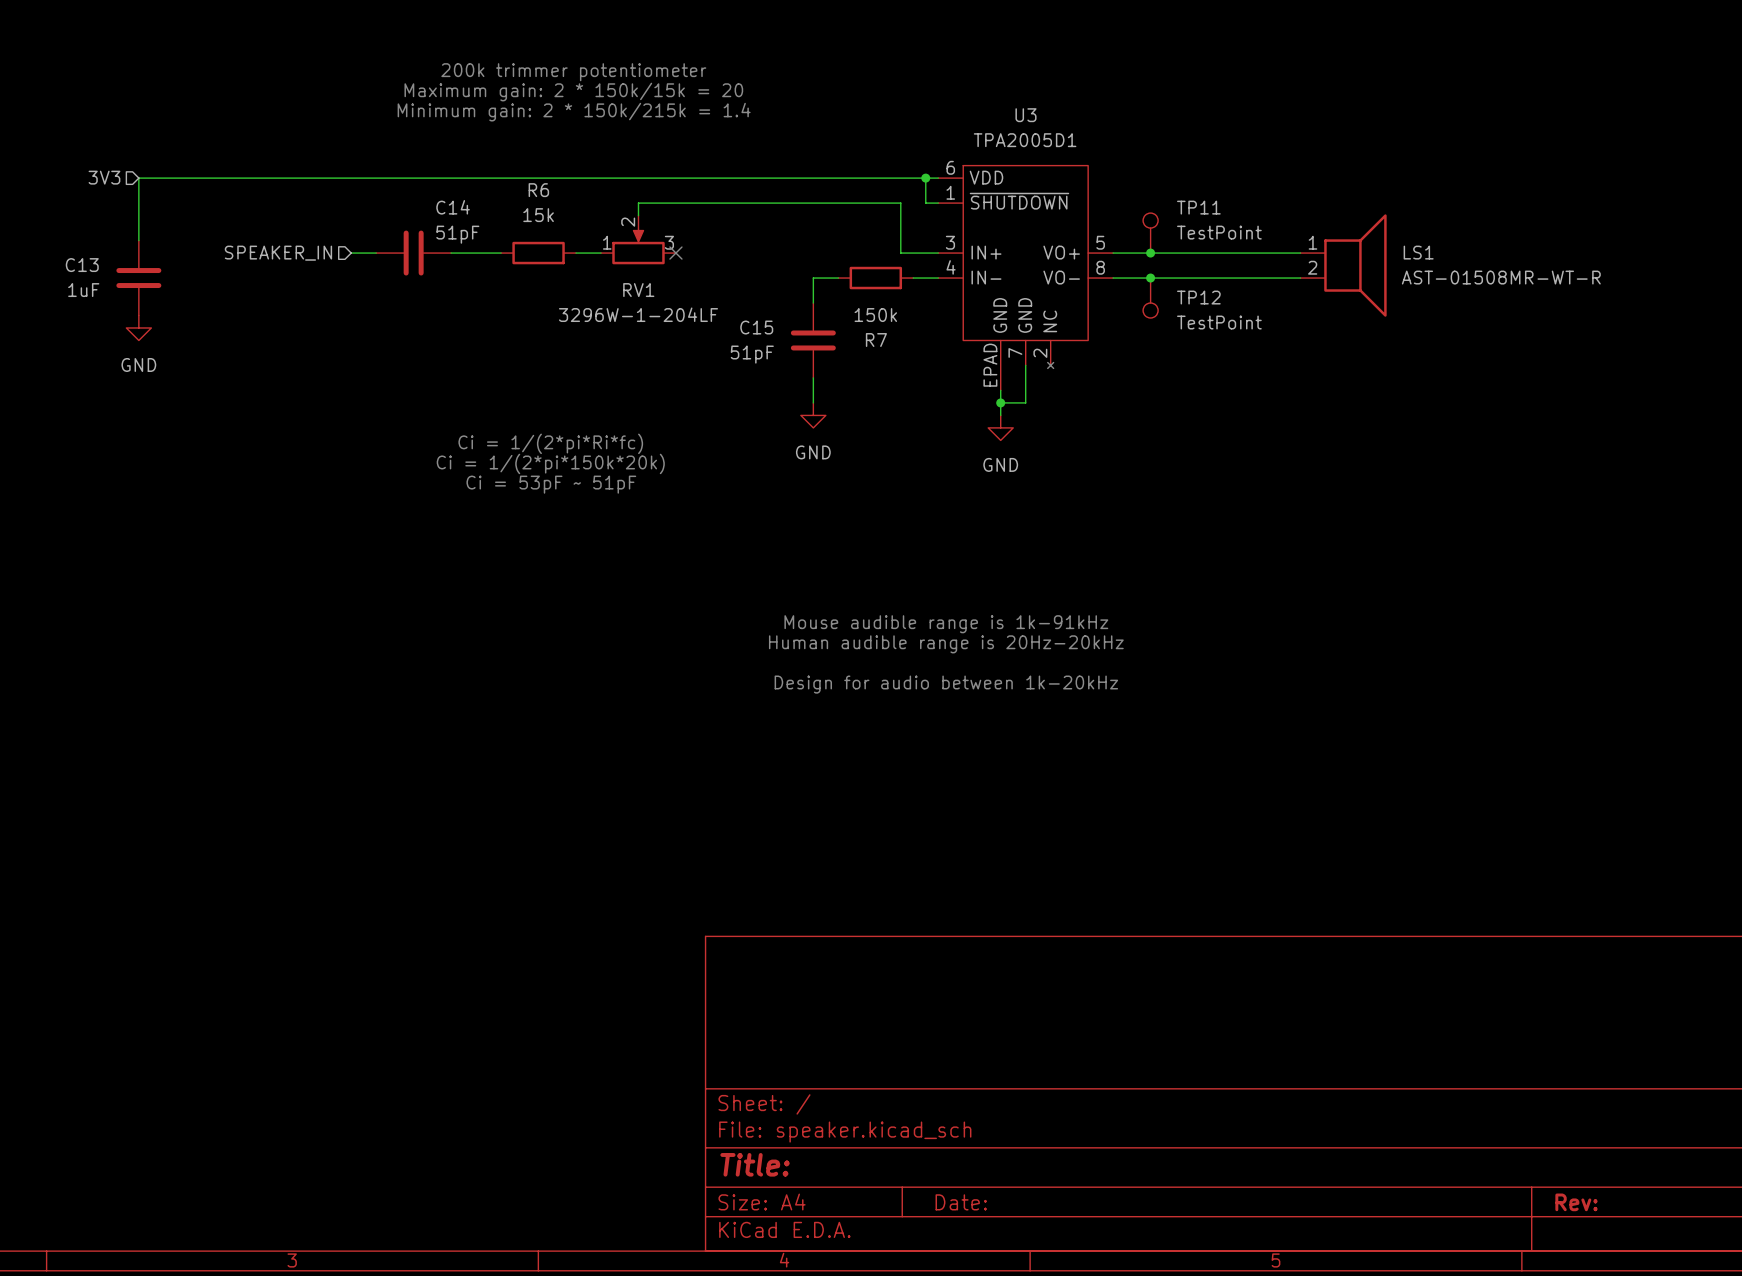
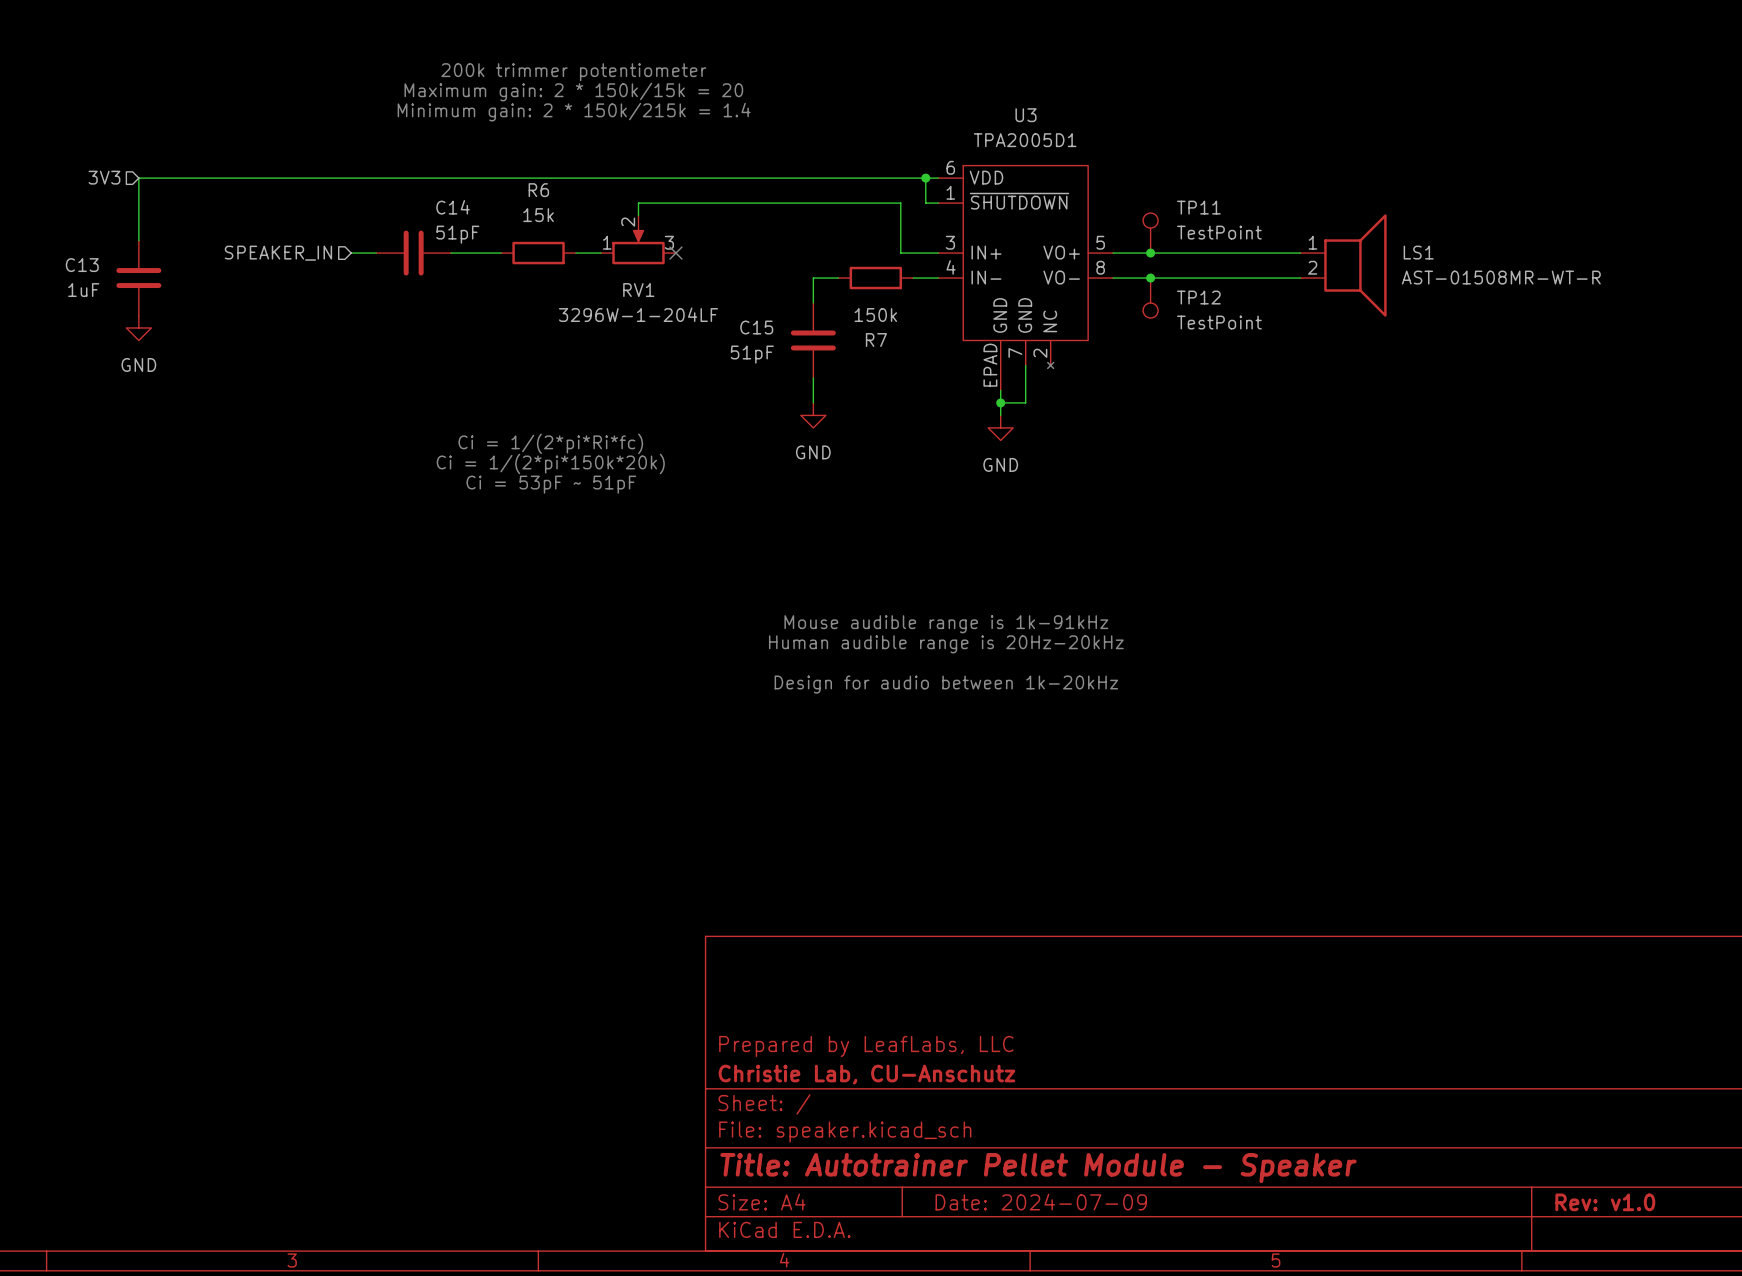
title block: none -> Prepared by LeafLabs, LLC (866, 1046)
title block: none -> Christie Lab, CU-Anschutz (866, 1074)
title block: Title: (755, 1164) -> Title: Autotrainer Pellet Module - Speaker (1038, 1168)
title block: Date: (961, 1202) -> Date: 2024-07-09 (1041, 1202)
title block: Rev: (1576, 1202) -> Rev: v1.0 (1605, 1202)

